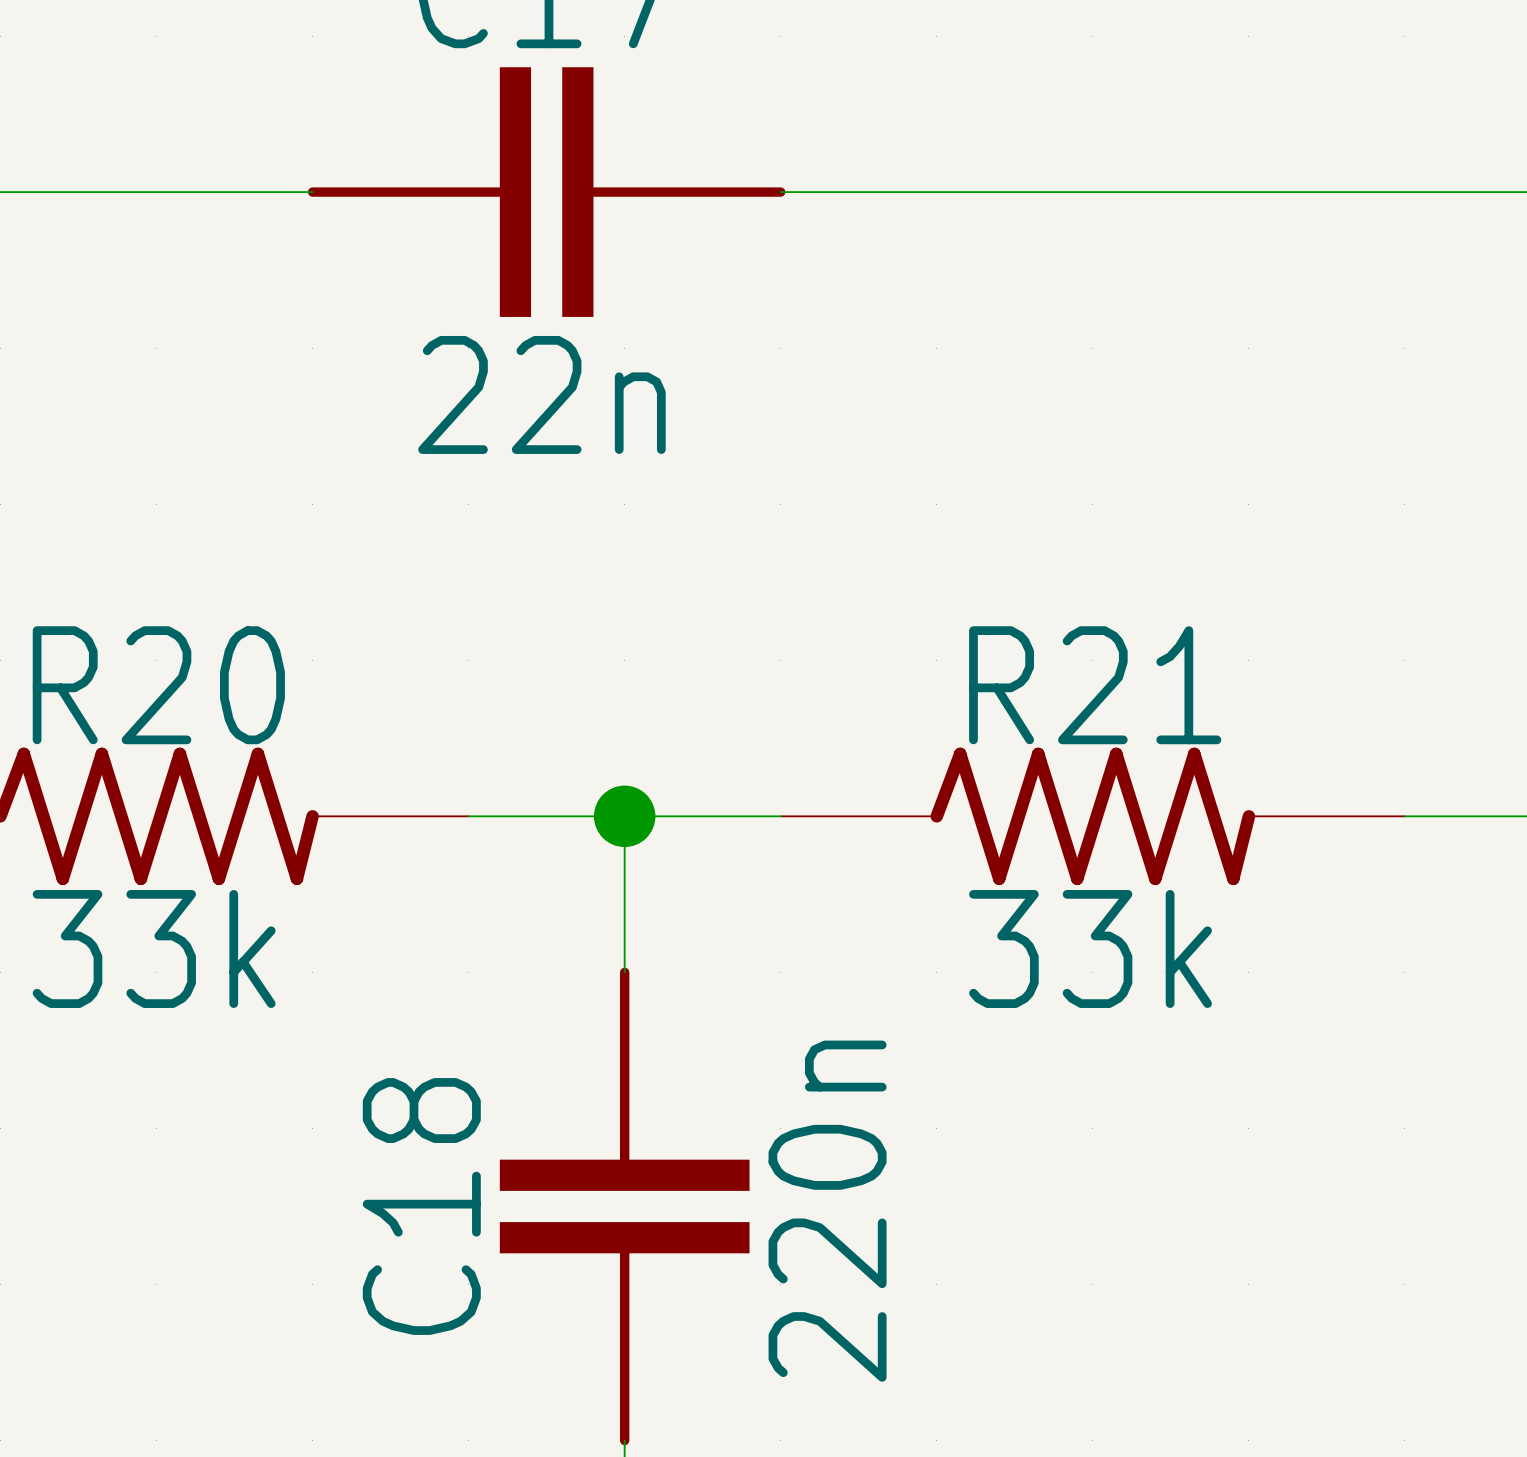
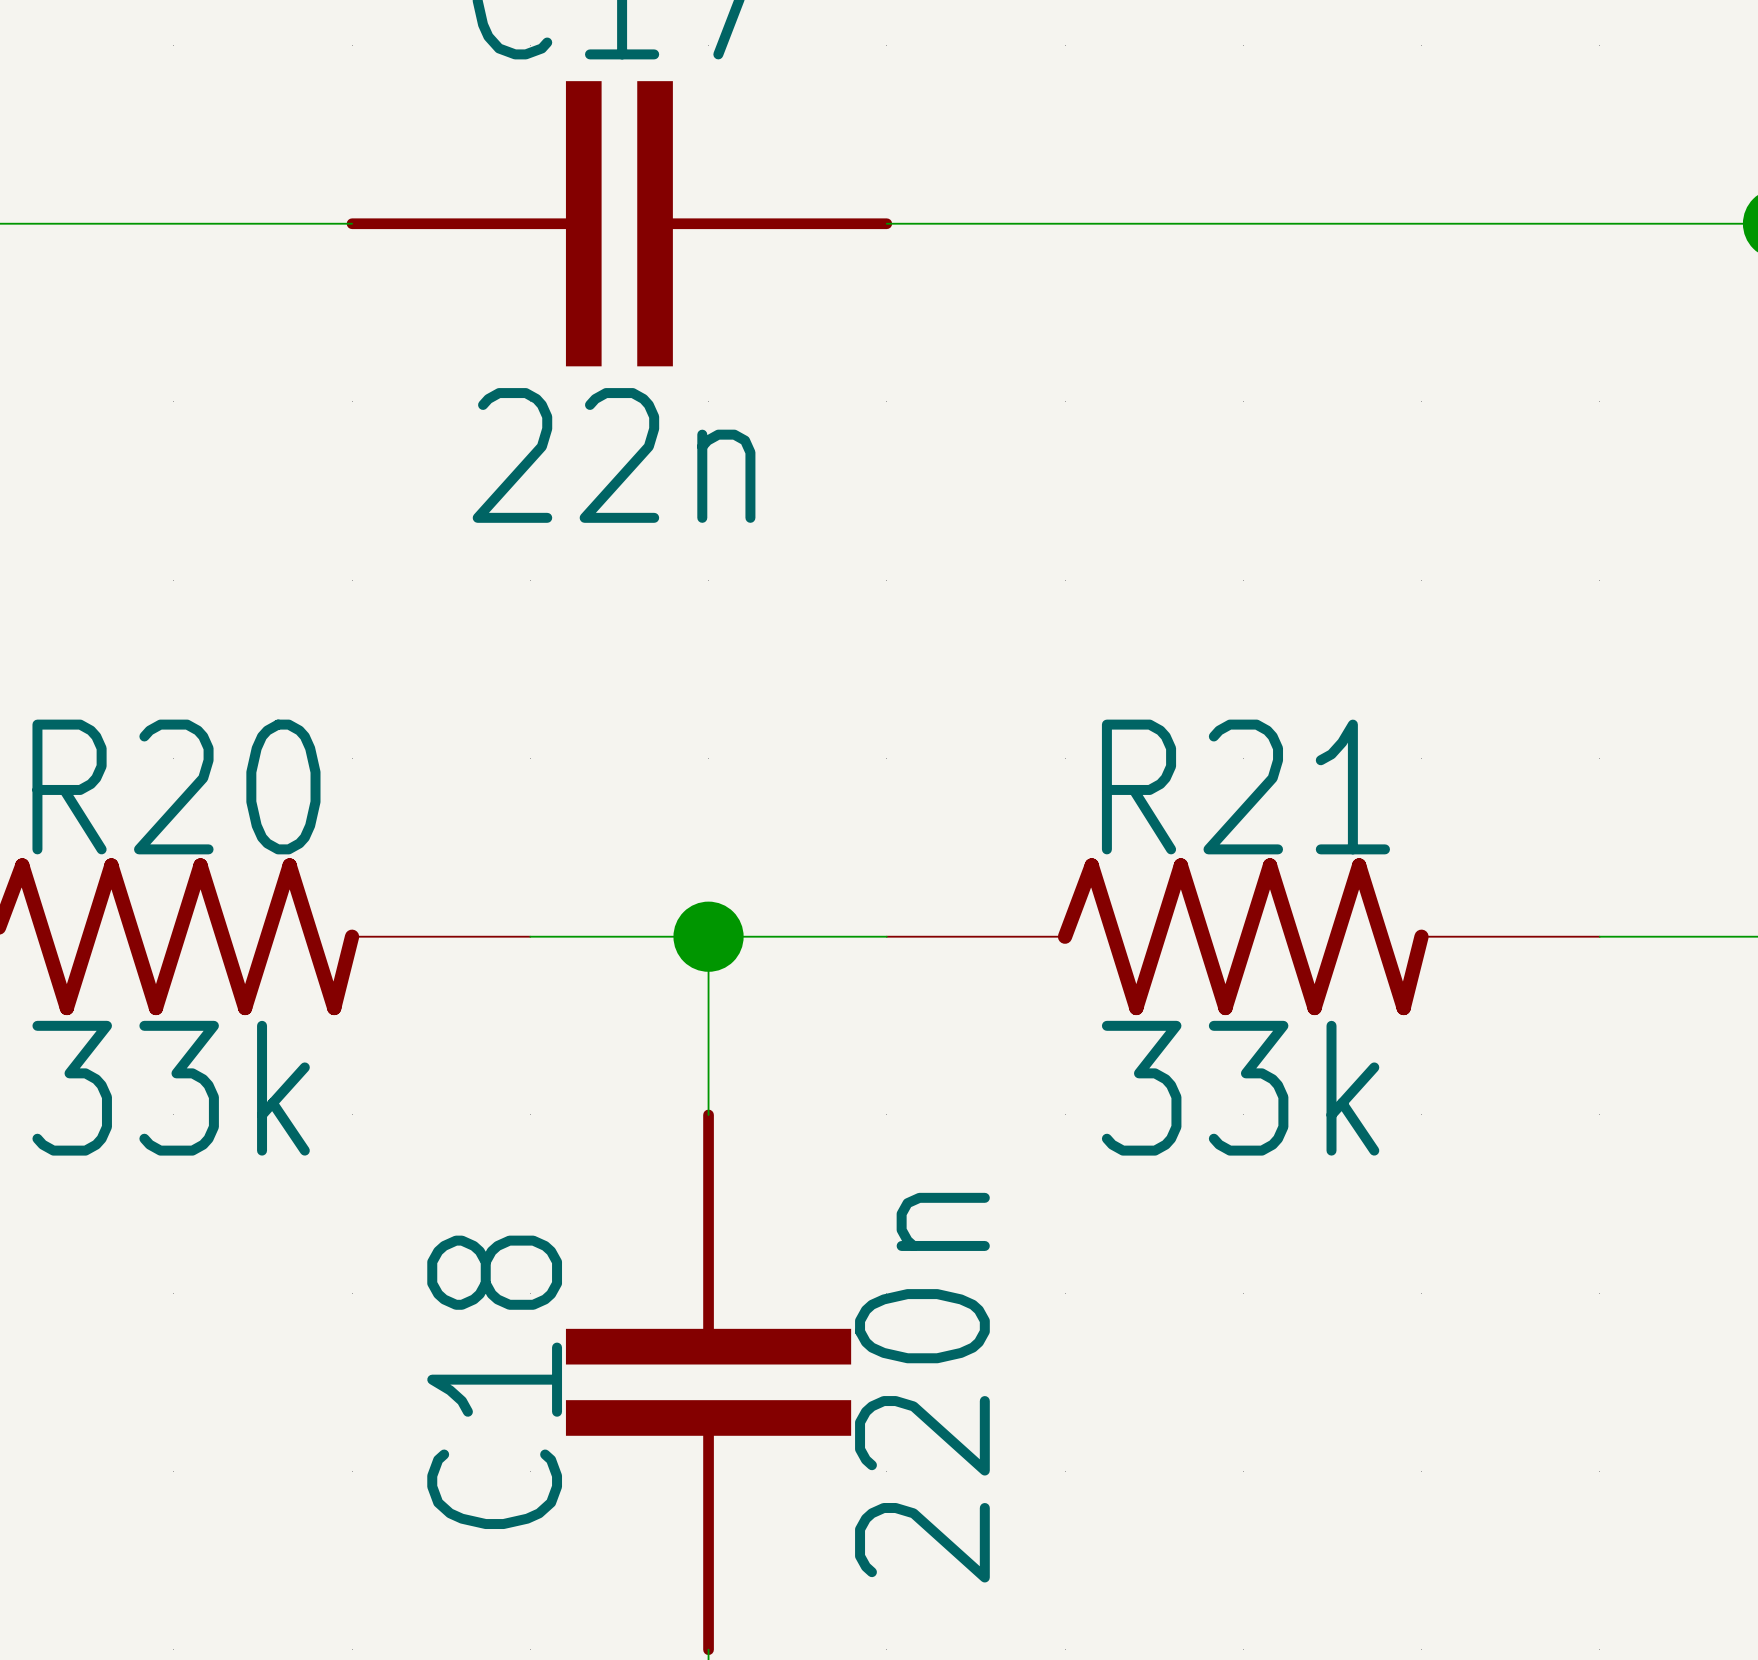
C18 name position: C18 (421, 1206) -> C18 (494, 1382)
C18 value position: 220n (827, 1211) -> 220n (922, 1387)

